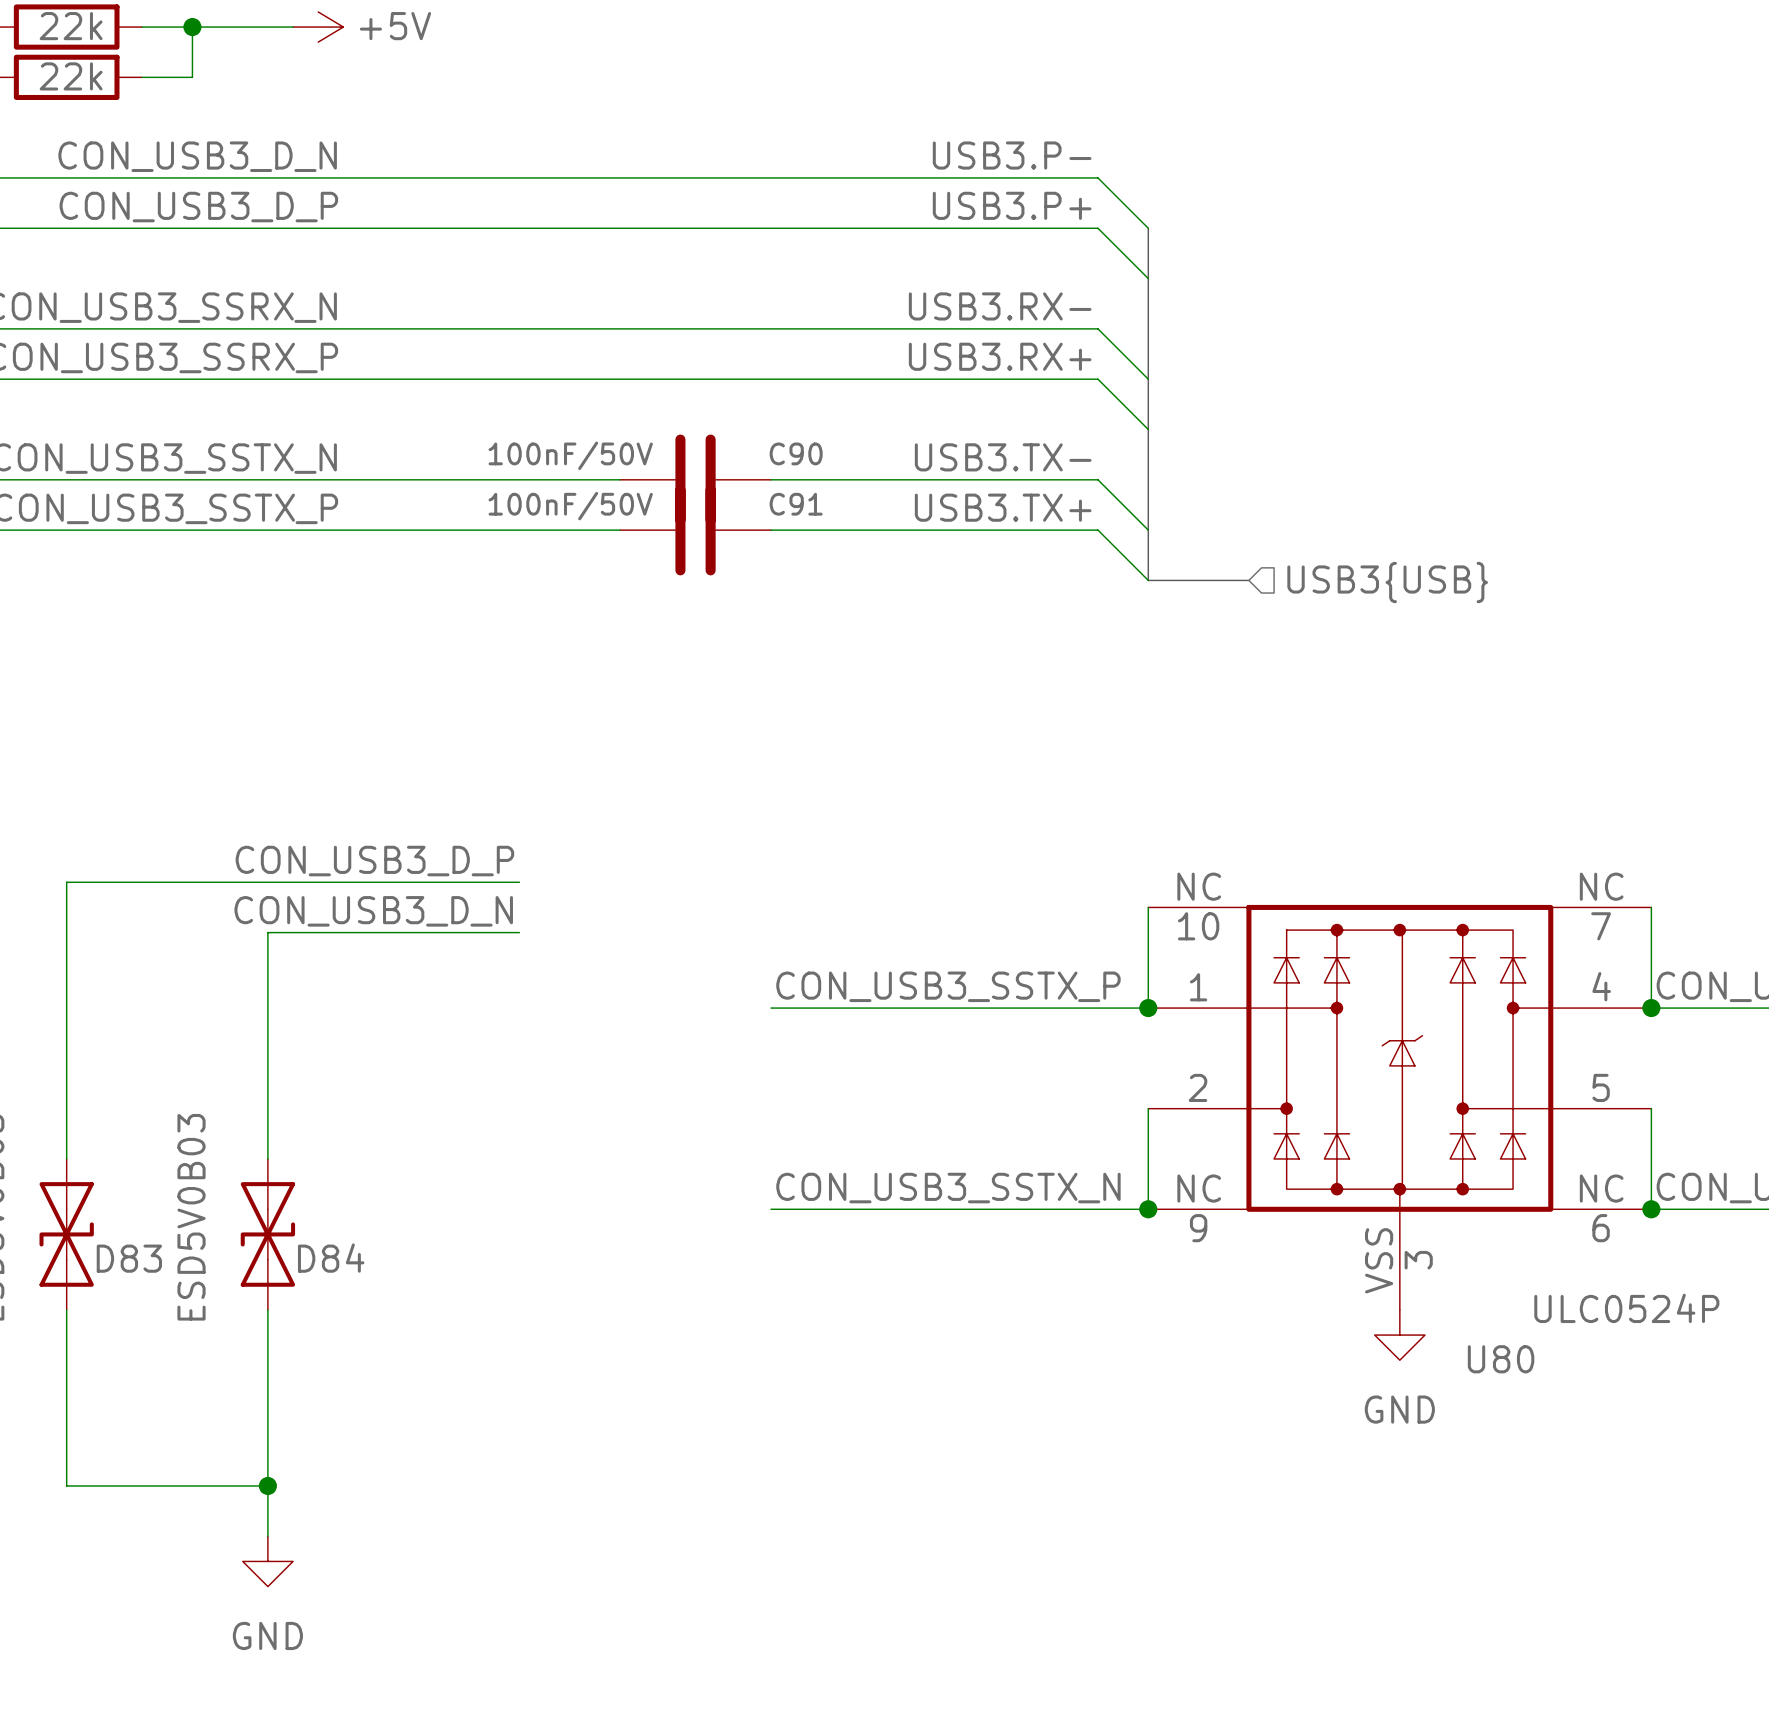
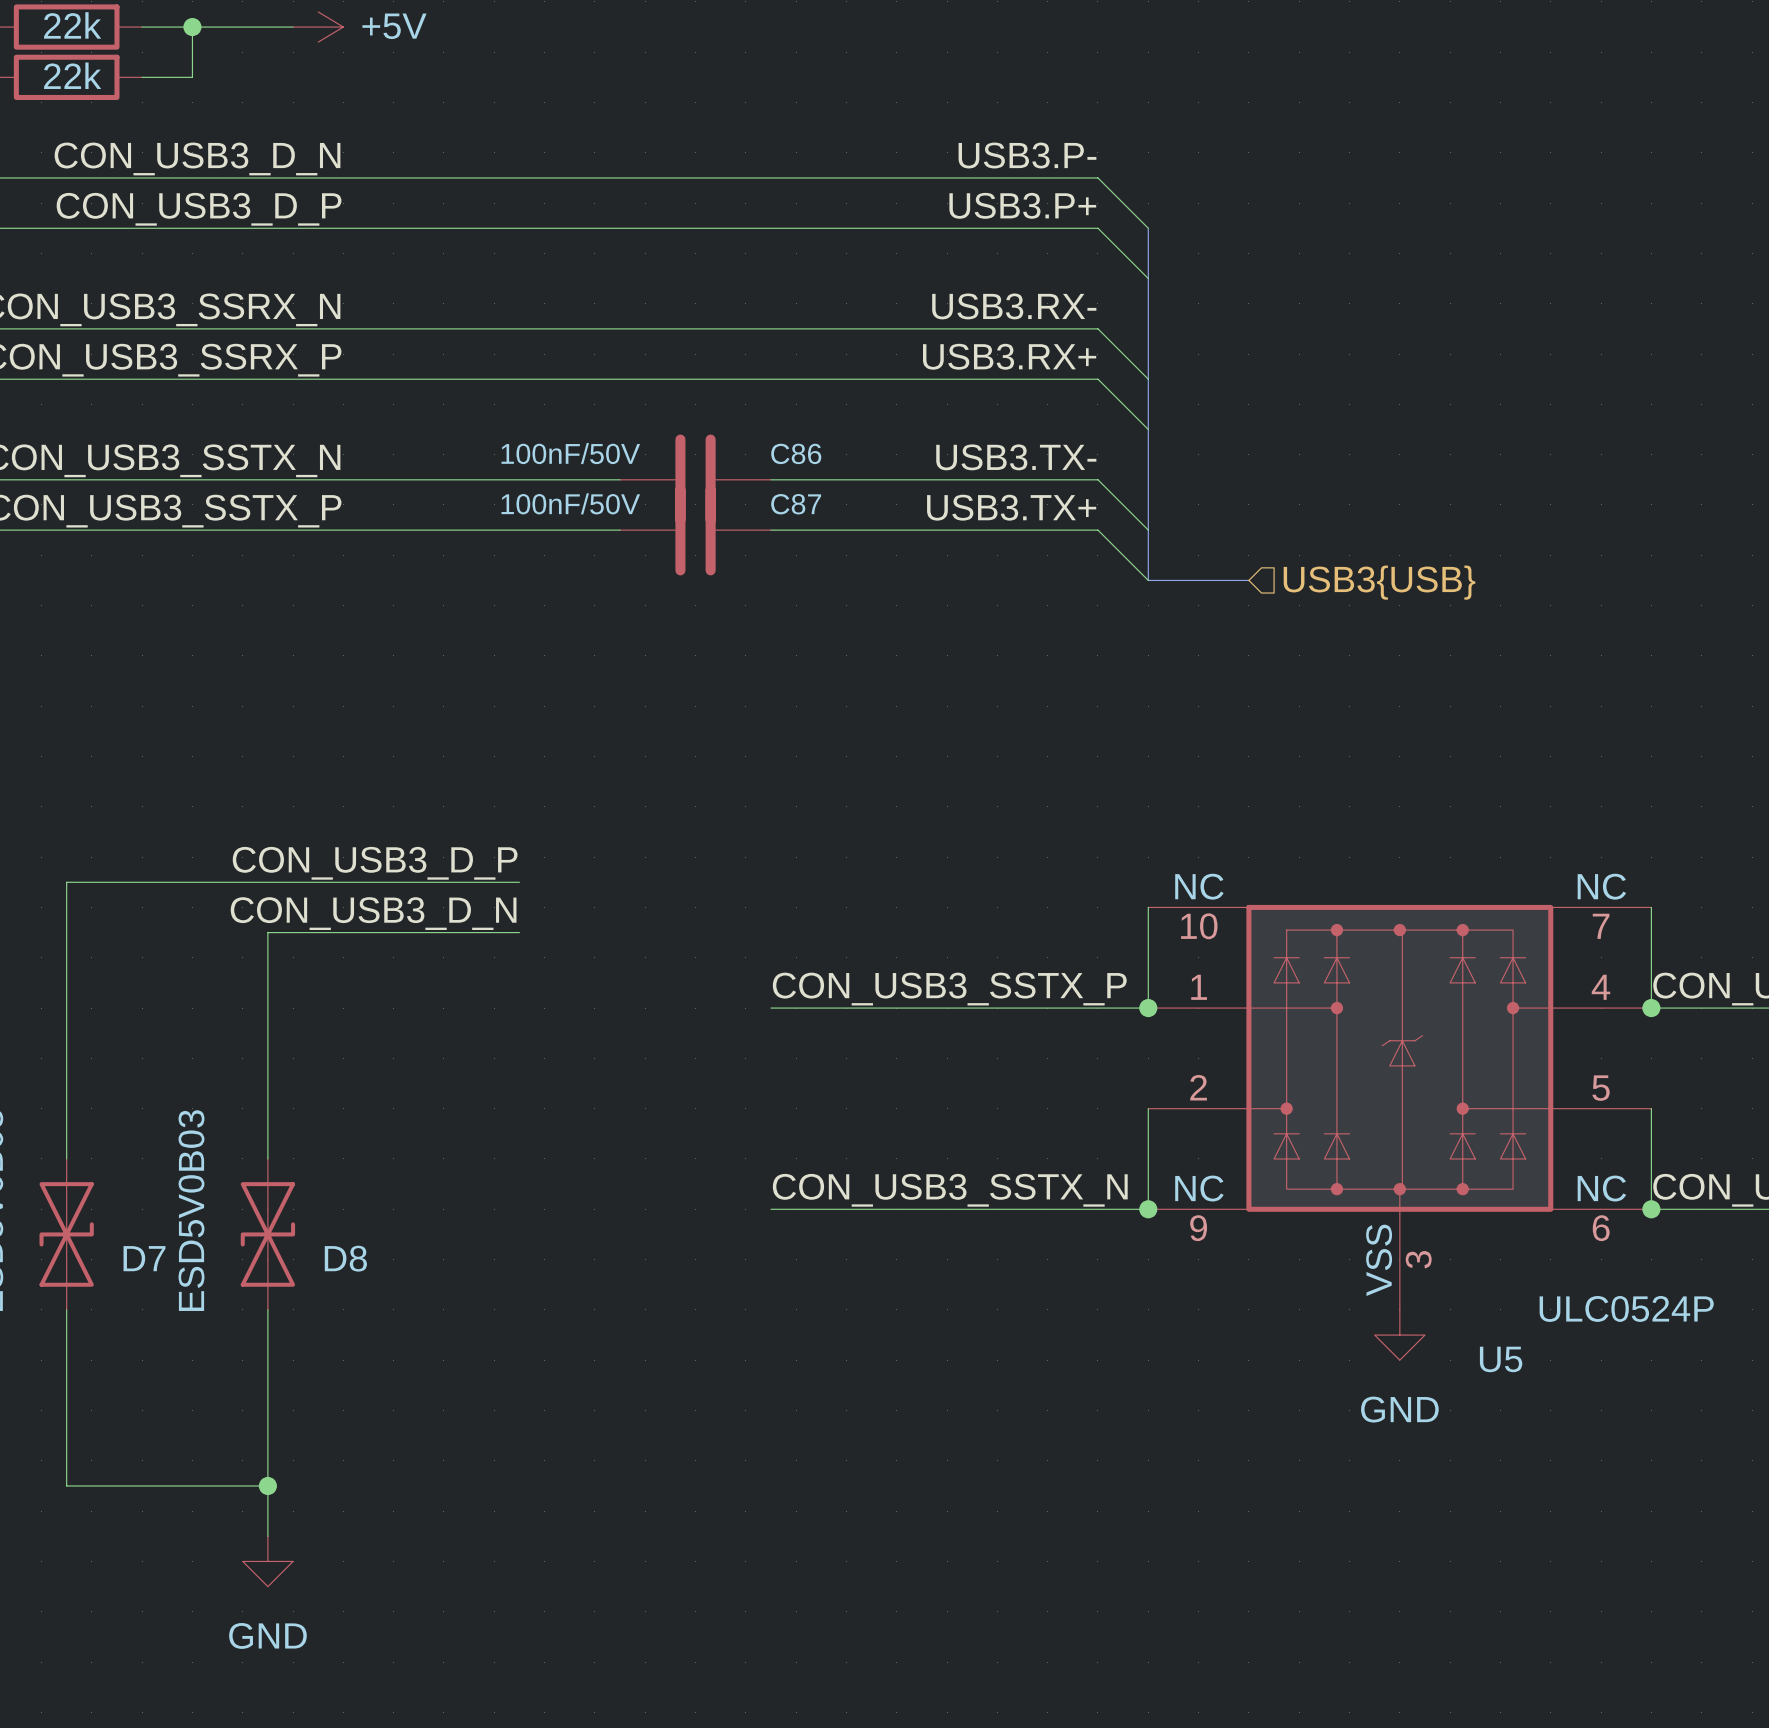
C90 name: C90 (796, 453) -> C86 (796, 453)
C91 name: C91 (796, 504) -> C87 (796, 504)
D83 name: D83 (129, 1258) -> D7 (144, 1258)
D84 name: D84 (331, 1258) -> D8 (345, 1258)
U80 name: U80 (1501, 1359) -> U5 (1501, 1359)

